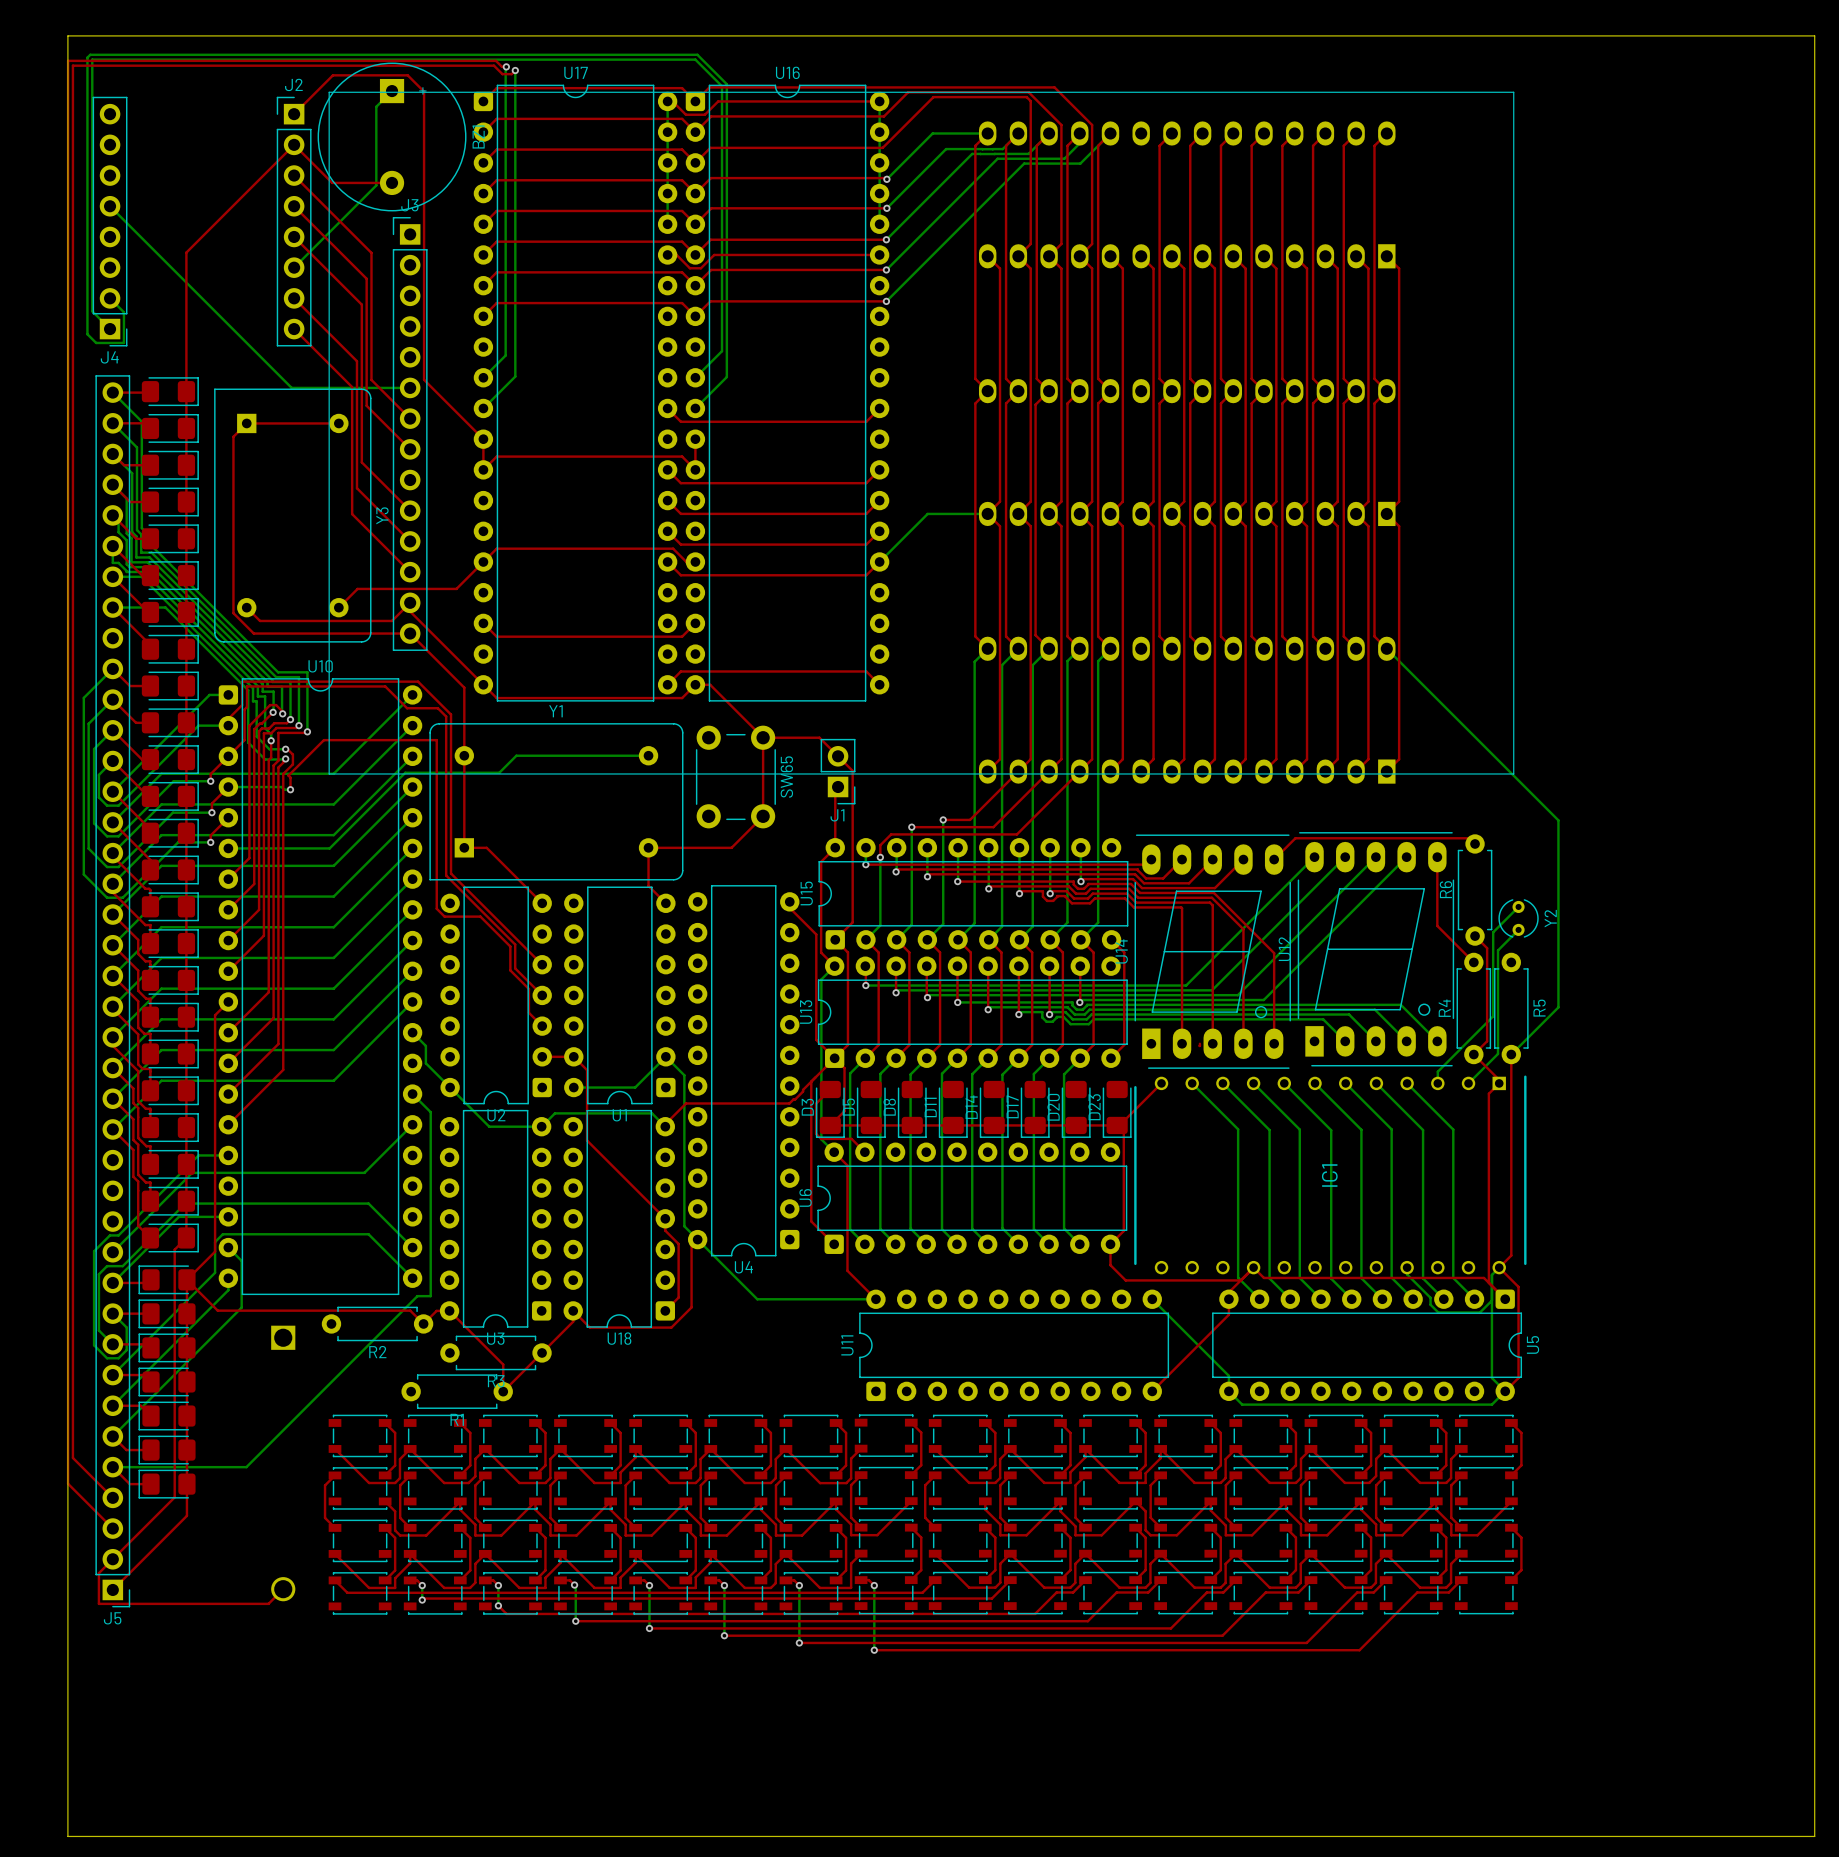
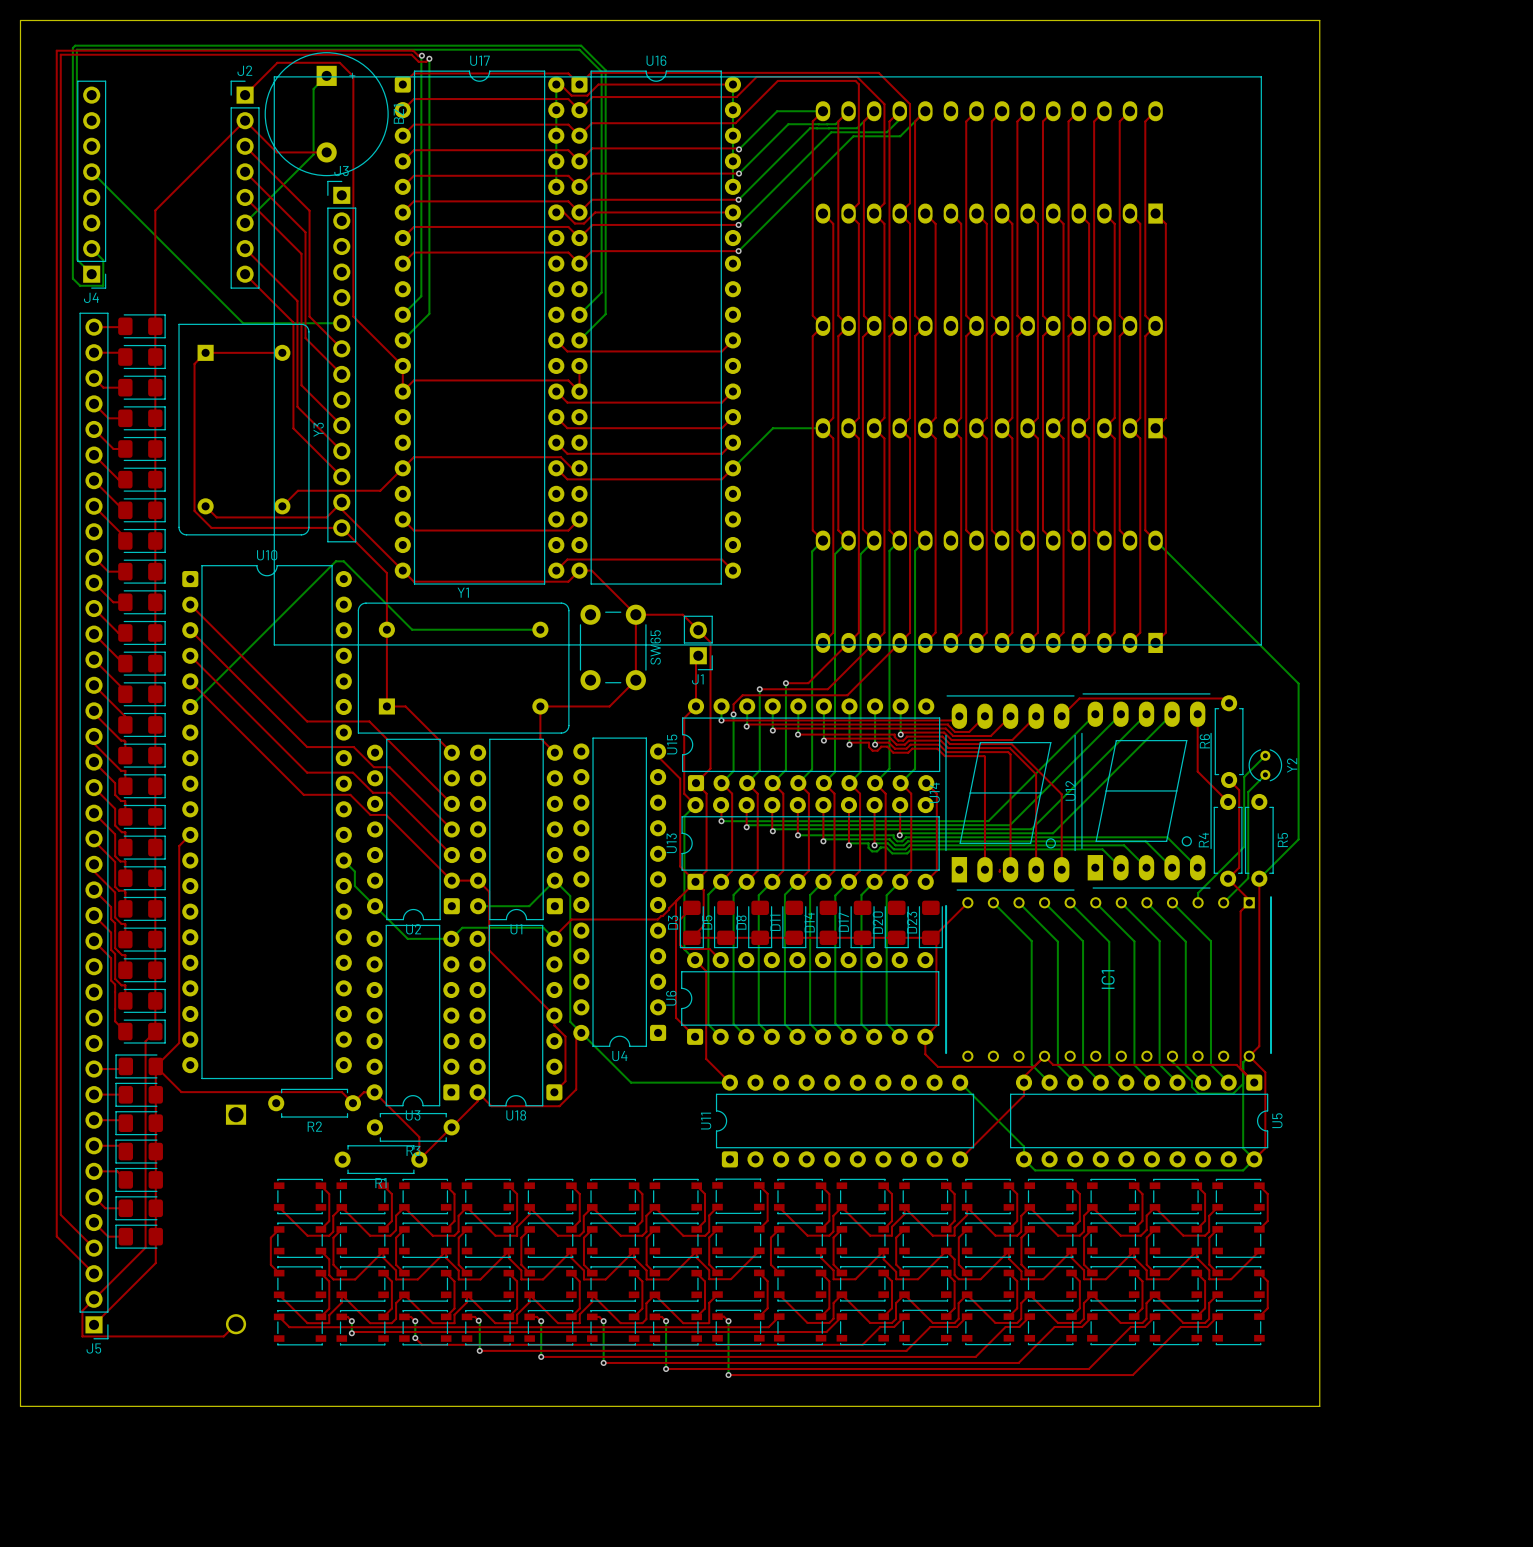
board edge: (67, 35) (1814, 35) (1814, 1836) (67, 1836) (67, 35) -> (20, 20) (20, 1406) (1319, 1406) (1319, 20) (20, 20)
bottom track: (112, 392) (141, 421) (141, 528) (146, 532) (146, 547) (153, 547) (278, 672) (307, 672) (307, 731) -> none
bottom track: (112, 423) (137, 447) (137, 530) (141, 534) (141, 552) (151, 552) (276, 677) (298, 677) (298, 725) -> none
bottom track: (112, 454) (132, 473) (132, 532) (136, 536) (136, 557) (149, 557) (272, 681) (290, 681) (290, 719) -> none
bottom track: (112, 484) (126, 498) (126, 533) (131, 538) (131, 562) -> none
bottom track: (112, 515) (118, 515) (118, 532) (126, 540) (126, 564) (129, 567) (145, 567) (262, 684) (262, 691) (273, 691) (273, 712) -> none
bottom track: (112, 546) (112, 562) (118, 562) (126, 571) (143, 571) (257, 686) (257, 696) (265, 696) (265, 728) (271, 734) (271, 740) -> none
bottom track: (131, 562) (147, 562) (267, 682) (268, 686) -> none
bottom track: (112, 576) (141, 576) (253, 688) (253, 701) (256, 701) (256, 736) (269, 749) (285, 749) -> none
bottom track: (112, 607) (165, 607) (248, 690) (248, 742) (265, 759) (285, 758) -> none
bottom track: (112, 668) (83, 697) (83, 874) (107, 897) (122, 897) (178, 842) (210, 842) -> none
bottom track: (267, 686) (282, 686) (282, 713) -> none
bottom track: (228, 694) (209, 694) (112, 791) -> none
bottom track: (412, 694) (333, 773) (161, 773) (112, 822) -> none
bottom track: (112, 699) (88, 723) (88, 848) (107, 867) (118, 867) (172, 812) (211, 812) -> none
top track: (273, 712) (254, 729) (254, 883) (228, 909) -> none
via: (273, 712) -> none
top track: (282, 713) (276, 705) (270, 705) (249, 725) (249, 858) (228, 879) -> none
via: (282, 713) -> none
top track: (290, 719) (286, 723) (274, 723) (269, 728) (261, 728) (259, 731) (259, 909) (228, 940) -> none
via: (290, 719) -> none
top track: (228, 725) (228, 718) (242, 705) (242, 681) (418, 681) (451, 714) (451, 873) -> (190, 604) (307, 721) (369, 721) (375, 727)
bottom track: (228, 725) (198, 725) (118, 805) (107, 805) (98, 797) (98, 774) (112, 761) -> none
top track: (298, 725) (296, 728) (276, 728) (271, 733) (263, 733) (263, 935) (228, 971) -> none
via: (298, 725) -> none
bottom track: (412, 725) (333, 804) (161, 804) (112, 853) -> none
bottom track: (112, 730) (94, 749) (94, 823) (107, 836) (118, 836) (173, 781) (210, 781) -> none
top track: (307, 731) (278, 732) (278, 760) (273, 765) (273, 1018) (228, 1063) -> none
via: (307, 731) -> none
top track: (271, 740) (271, 757) (268, 760) (268, 992) (228, 1032) -> none
via: (271, 740) -> none
top track: (285, 749) (292, 754) (292, 764) (283, 773) (283, 1069) (228, 1124) -> none
via: (285, 749) -> none
bottom track: (516, 755) (499, 772) (405, 772) (329, 848) (228, 848) -> (430, 629) (412, 629) (343, 561) (335, 561) (190, 706)
bottom track: (412, 756) (333, 835) (161, 835) (112, 883) -> none
top track: (285, 758) (278, 767) (278, 1044) (228, 1094) -> none
via: (285, 758) -> none
top track: (210, 781) (210, 773) (244, 740) (246, 686) (385, 686) (407, 708) (437, 708) (446, 716) (446, 875) (515, 944) (515, 968) -> none
via: (210, 781) -> none
top track: (228, 787) (211, 803) (211, 812) -> (190, 655) (307, 772) (352, 772) (373, 792) (389, 792) (440, 843)
bottom track: (228, 787) (281, 787) (284, 789) (290, 789) -> none
bottom track: (412, 787) (333, 865) (161, 865) (112, 914) -> none
top track: (290, 789) (290, 777) (288, 775) (323, 740) (436, 740) (436, 908) -> (190, 630) (307, 747) (353, 747) (363, 757)
via: (290, 789) -> none
via: (211, 812) -> none
top track: (228, 817) (210, 835) (210, 842) -> (190, 681) (303, 794) (350, 794) (370, 814) (386, 814) (451, 880)
bottom track: (412, 817) (333, 896) (161, 896) (112, 945) -> none
via: (210, 842) -> none
bottom track: (412, 848) (333, 927) (161, 927) (112, 975) -> none
bottom track: (412, 879) (333, 957) (161, 957) (112, 1006) -> none
bottom track: (412, 909) (333, 988) (161, 988) (112, 1037) -> none
top track: (444, 916) (480, 916) (510, 946) (510, 970) (528, 988) (528, 1012) -> (370, 763) (373, 767) (389, 767) (429, 806)
bottom track: (412, 940) (333, 1019) (161, 1019) (112, 1068) -> none
bottom track: (412, 971) (333, 1050) (161, 1050) (112, 1098) -> none
bottom track: (412, 1001) (333, 1080) (161, 1080) (112, 1129) -> none
bottom track: (412, 1094) (430, 1112) (430, 1296) (417, 1296) (246, 1467) (112, 1467) -> none
bottom track: (412, 1124) (364, 1172) (192, 1172) (112, 1252) -> none
bottom track: (228, 1155) (198, 1155) (118, 1235) (109, 1235) (94, 1251) (94, 1345) (107, 1358) (118, 1358) (126, 1350) (126, 1327) (112, 1313) -> none
bottom track: (228, 1216) (178, 1216) (112, 1282) -> none
bottom track: (228, 1247) (241, 1260) (241, 1307) (112, 1436) -> none
bottom track: (412, 1247) (368, 1203) (185, 1203) (122, 1266) (107, 1266) (98, 1274) (98, 1330) (112, 1344) -> none
bottom track: (228, 1278) (228, 1290) (112, 1405) -> none
bottom track: (412, 1278) (368, 1234) (222, 1234) (215, 1242) (215, 1272) (112, 1375) -> none

